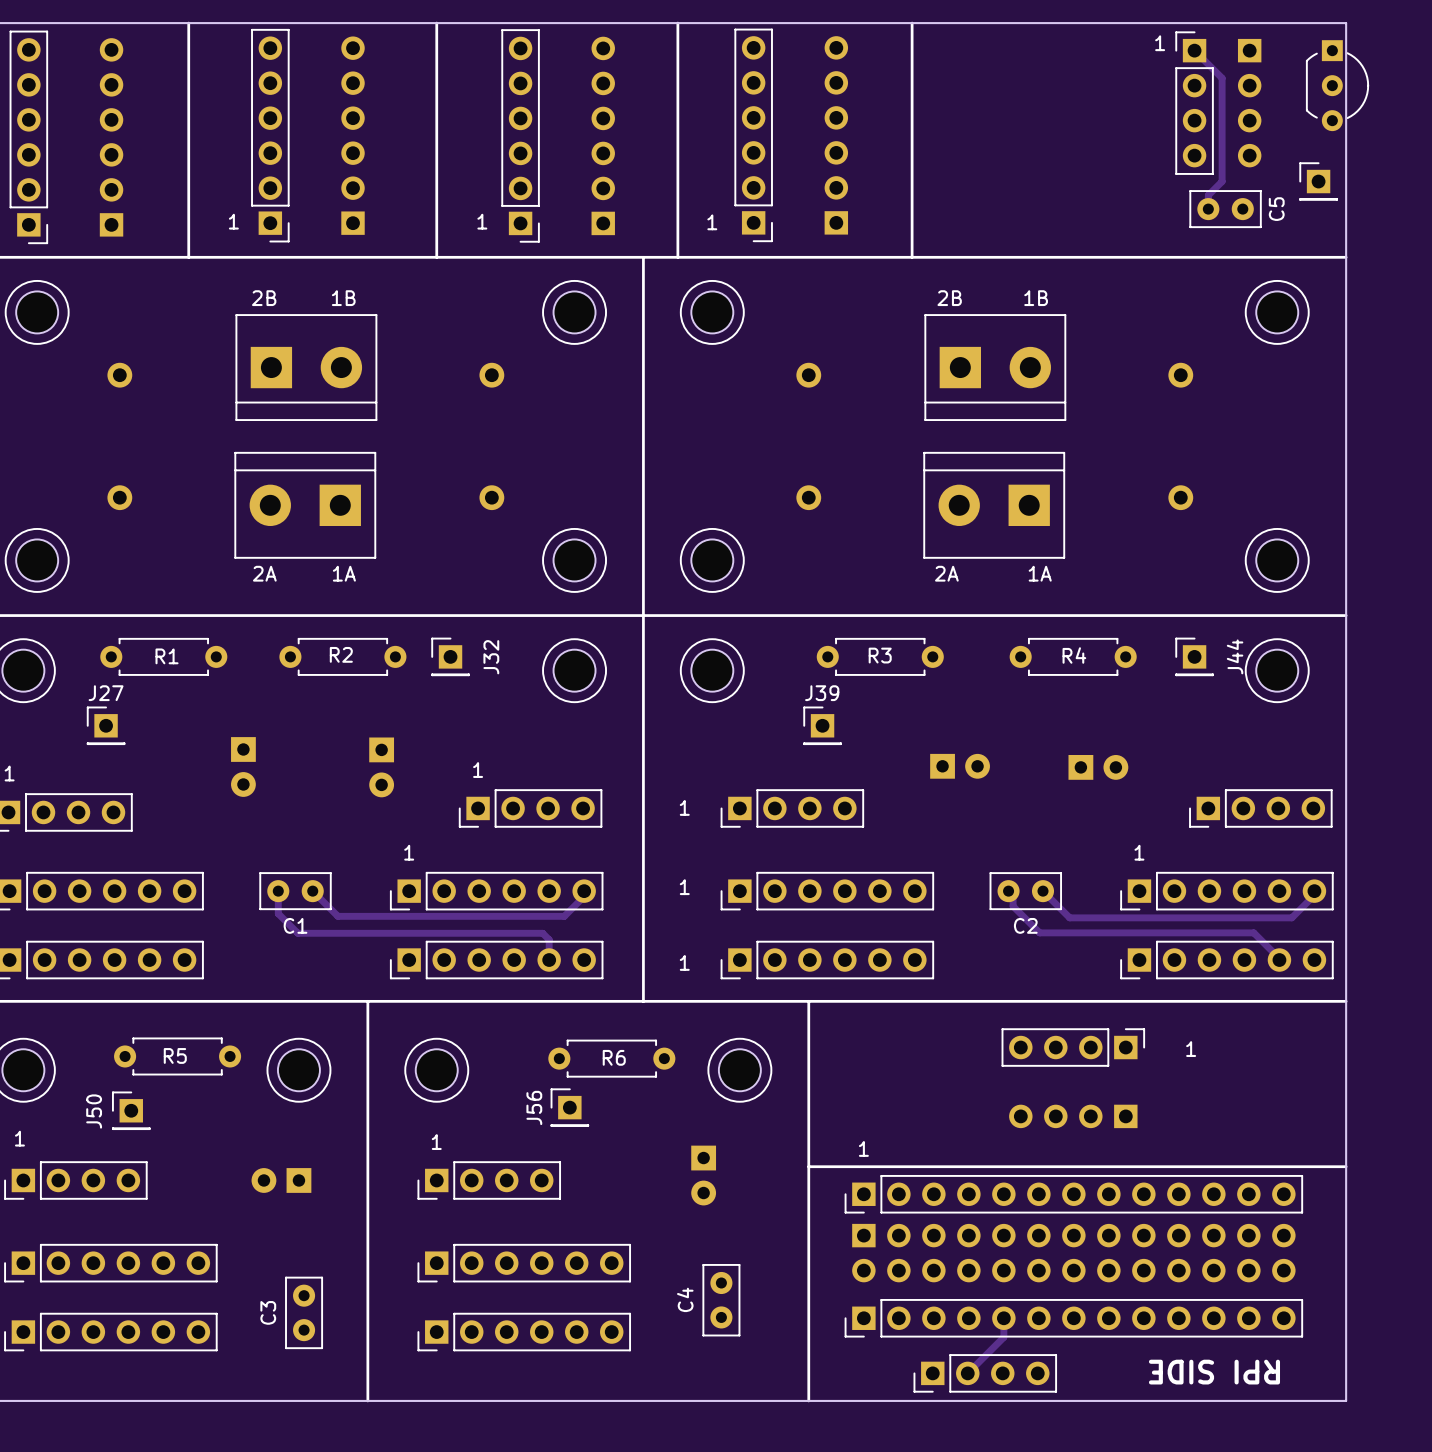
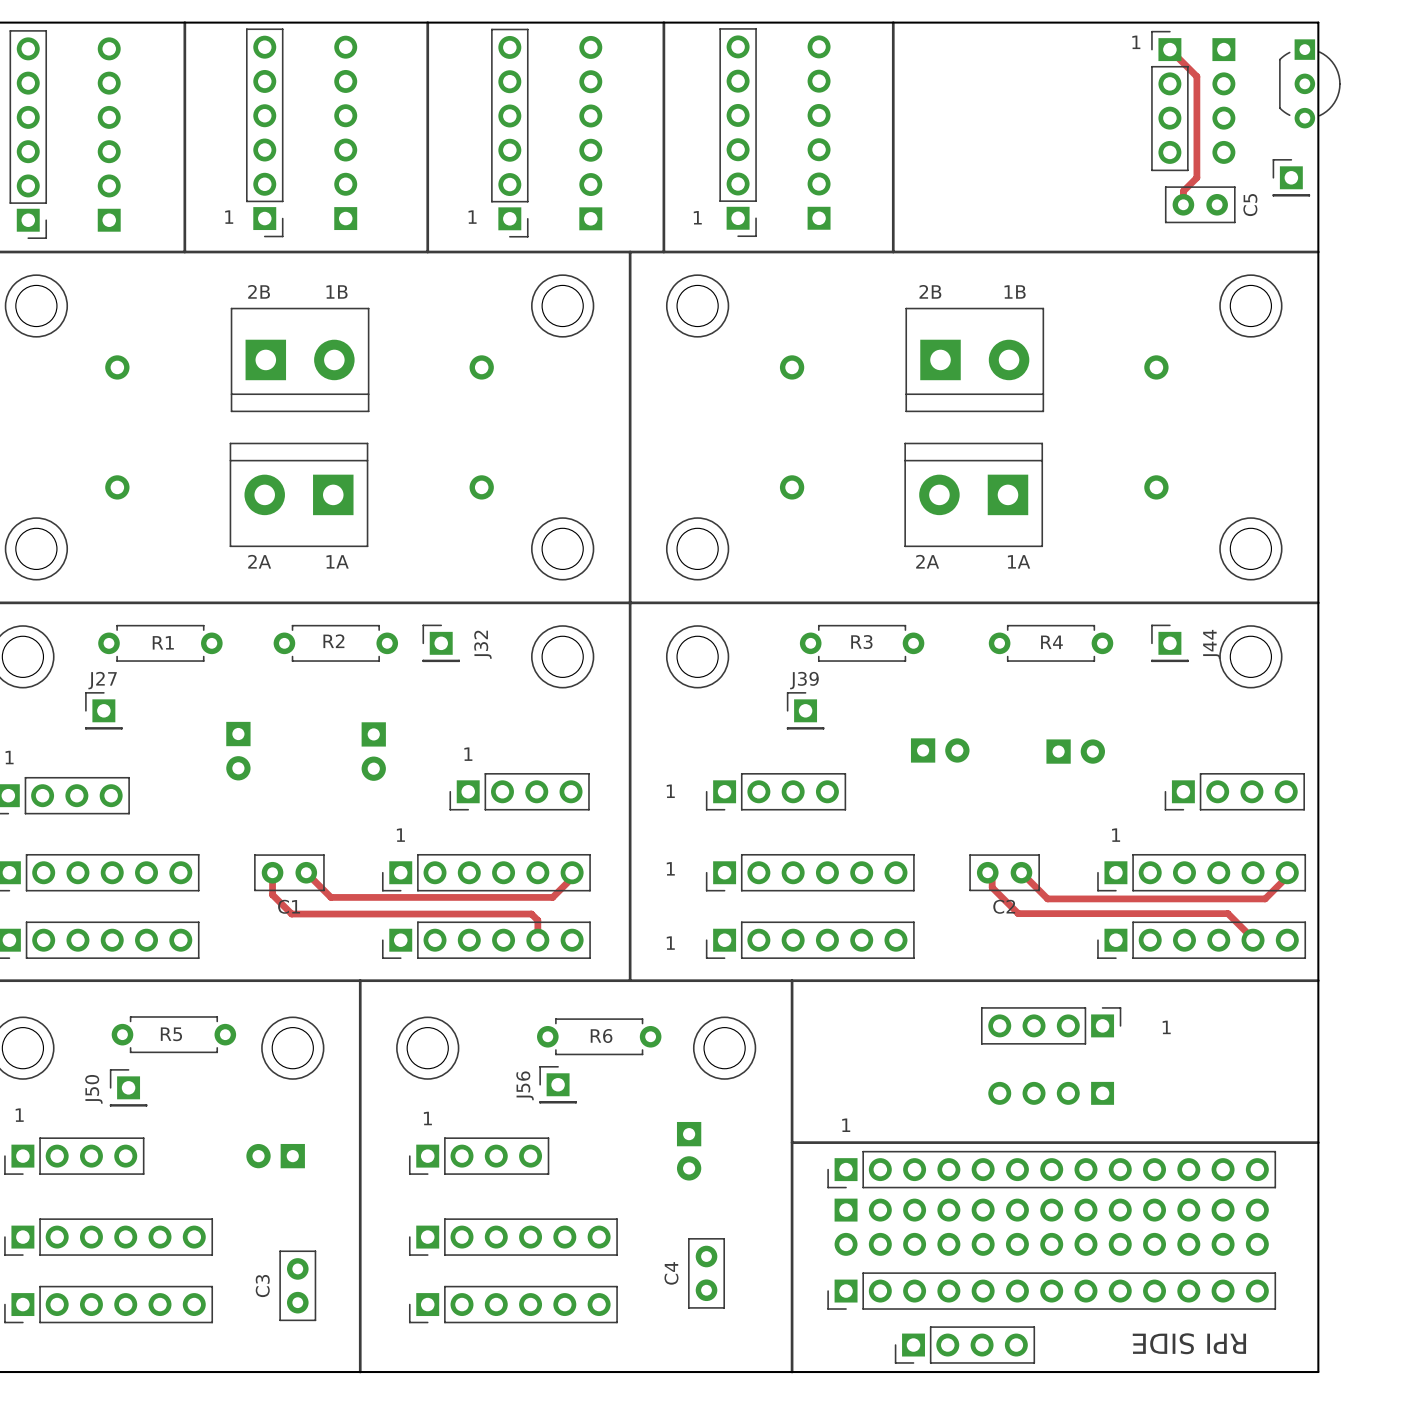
track: (1003, 1318) (1003, 1337) (967, 1373) -> none

